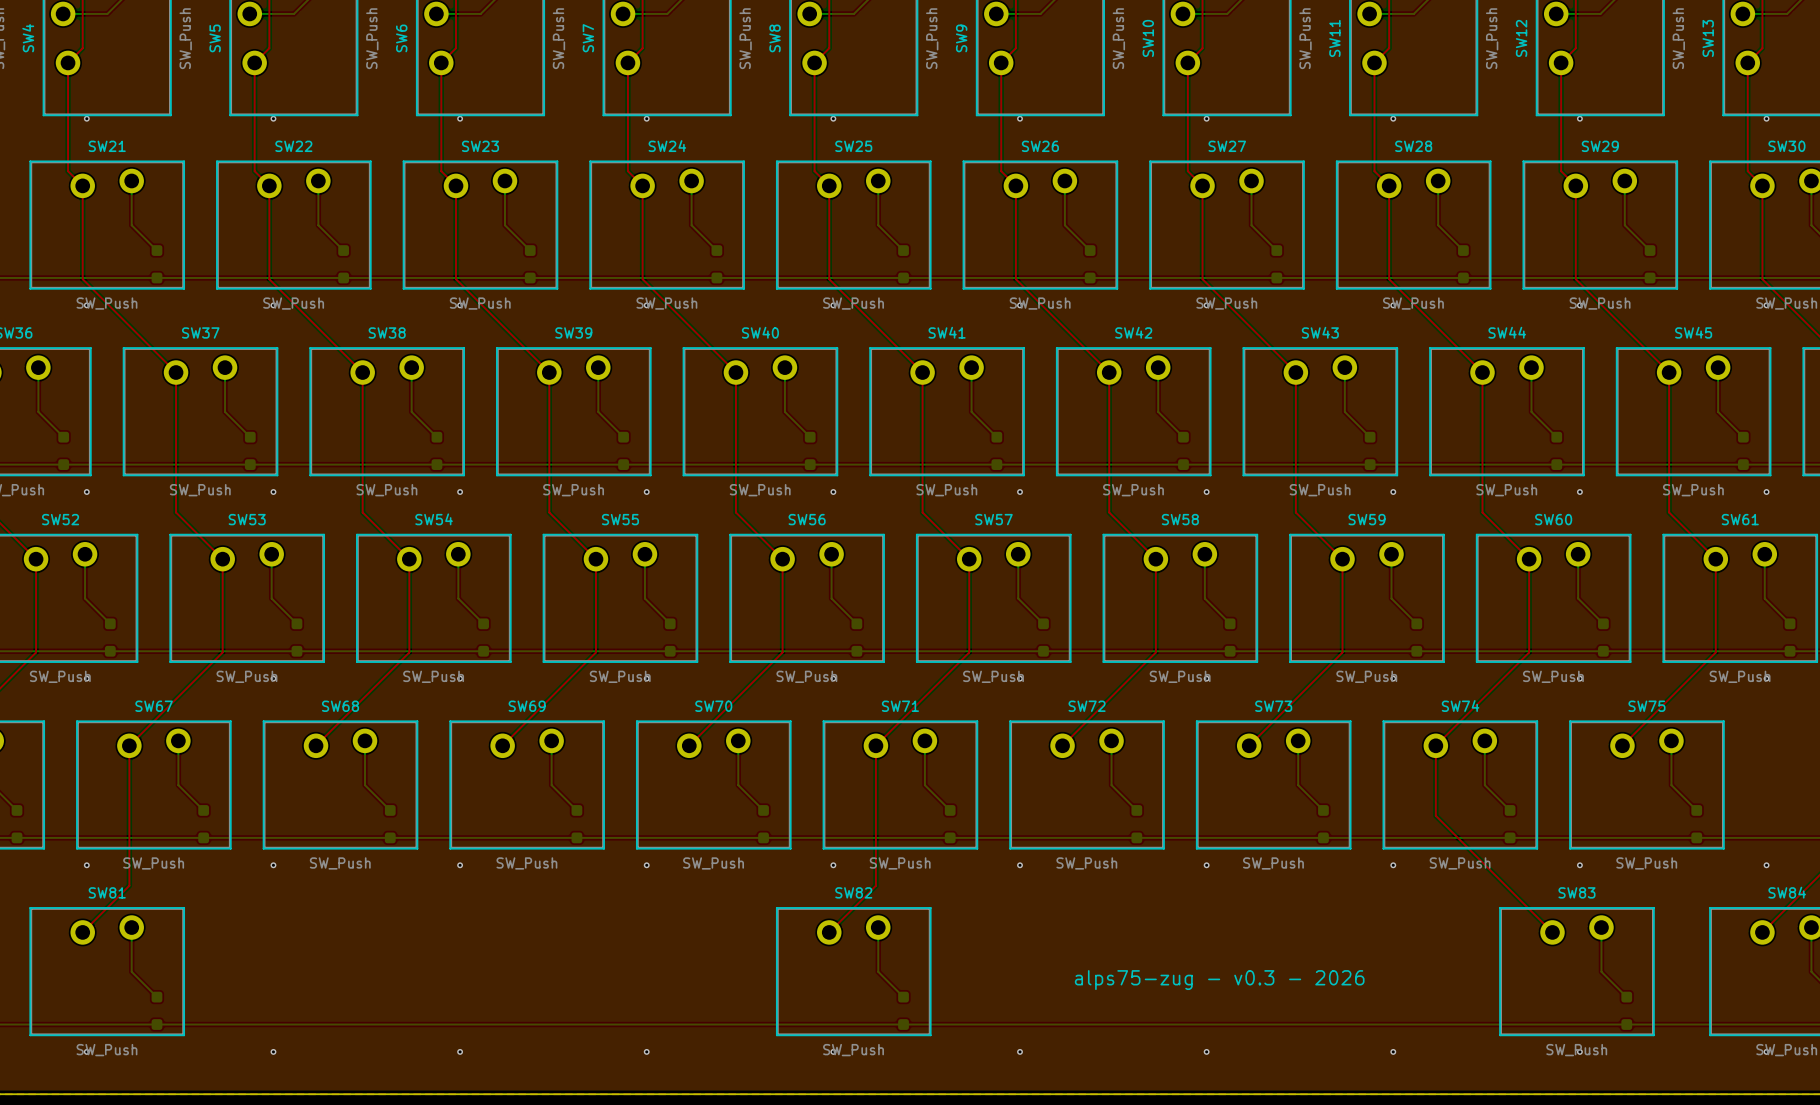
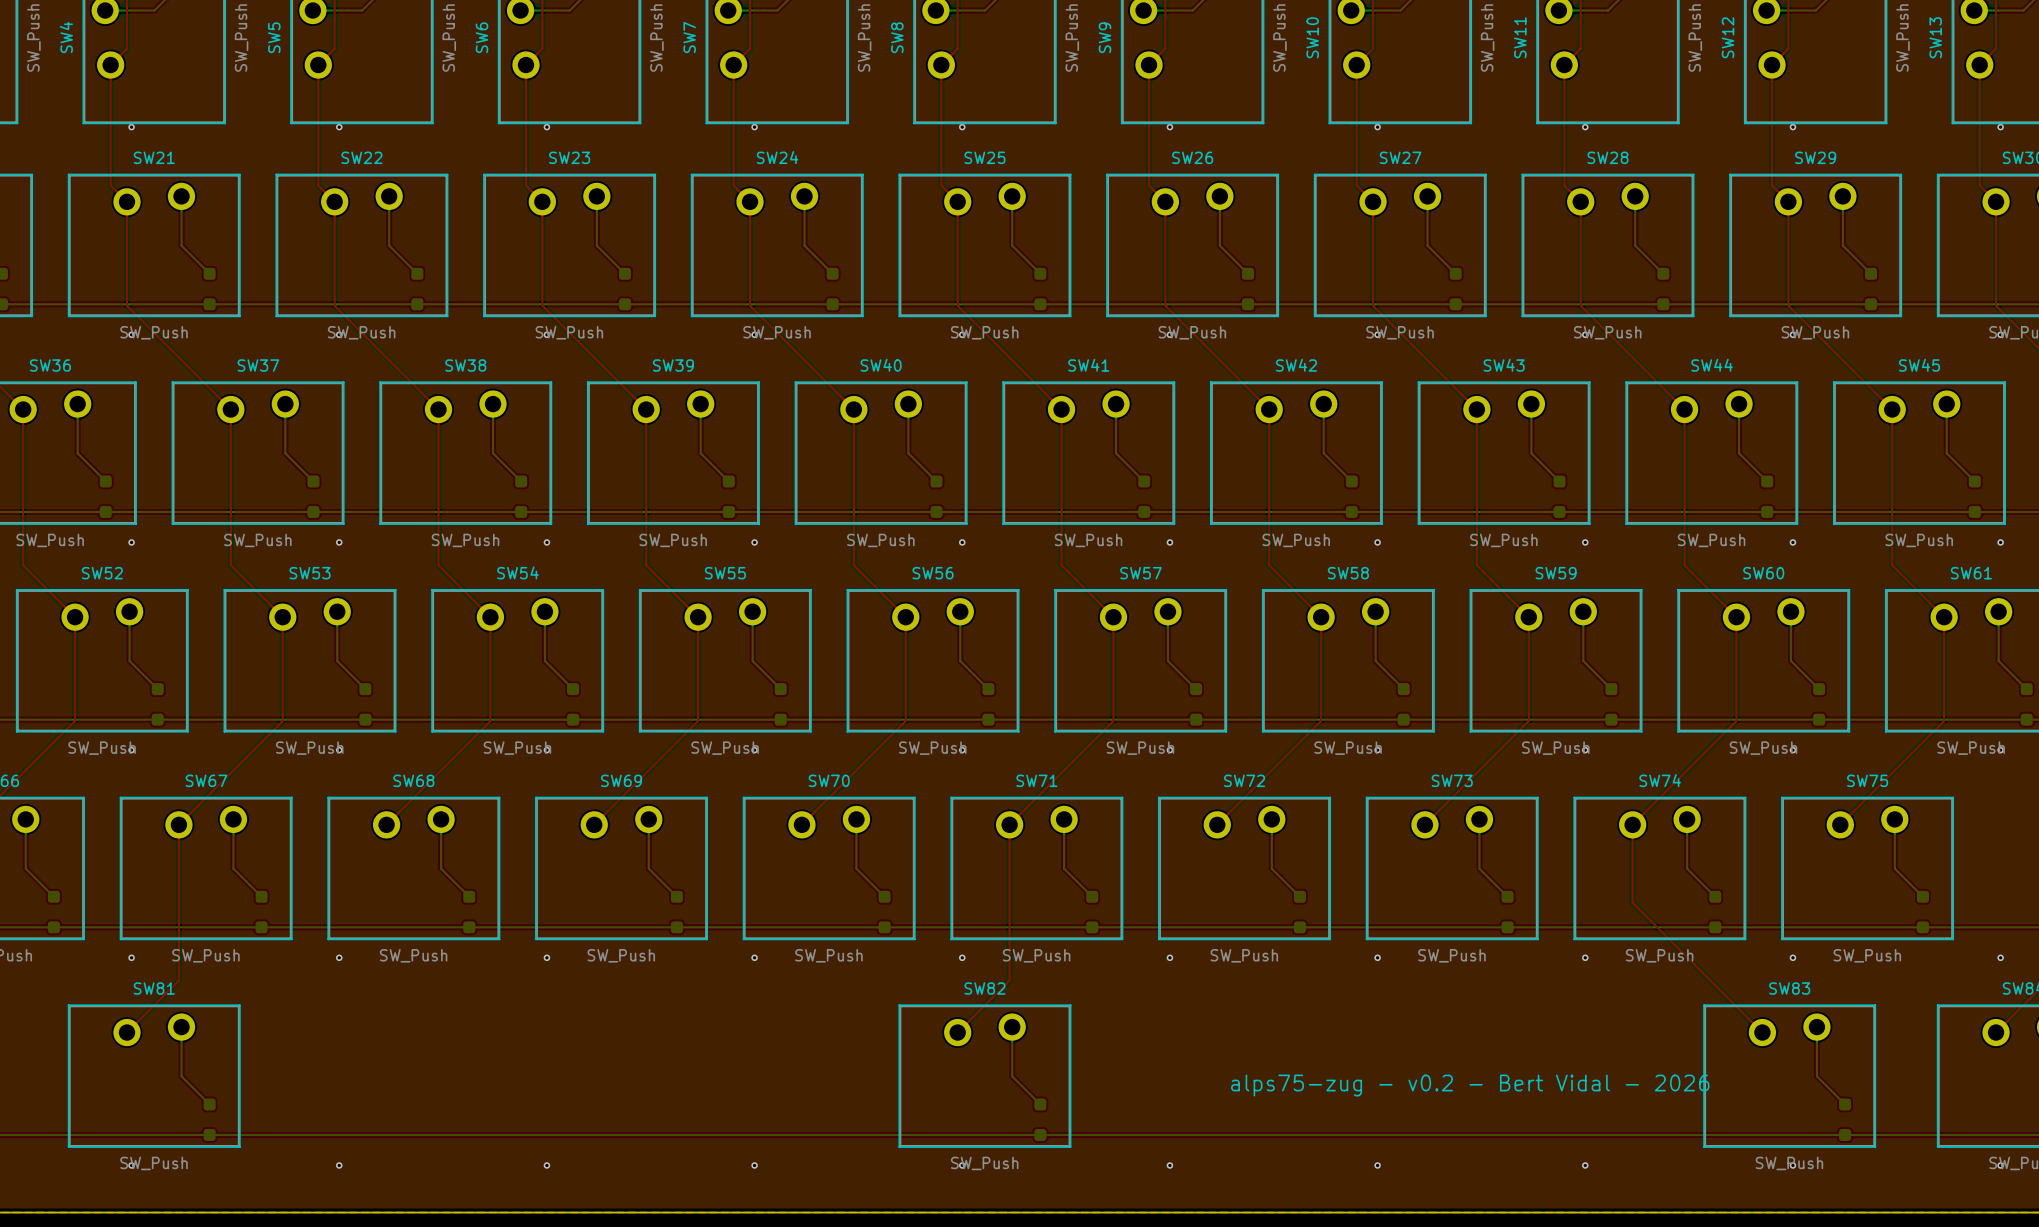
text: alps75-zug - v0.3 - 2026 (1219, 980) -> alps75-zug - v0.2 - Bert Vidal - 2026 (1470, 1085)

